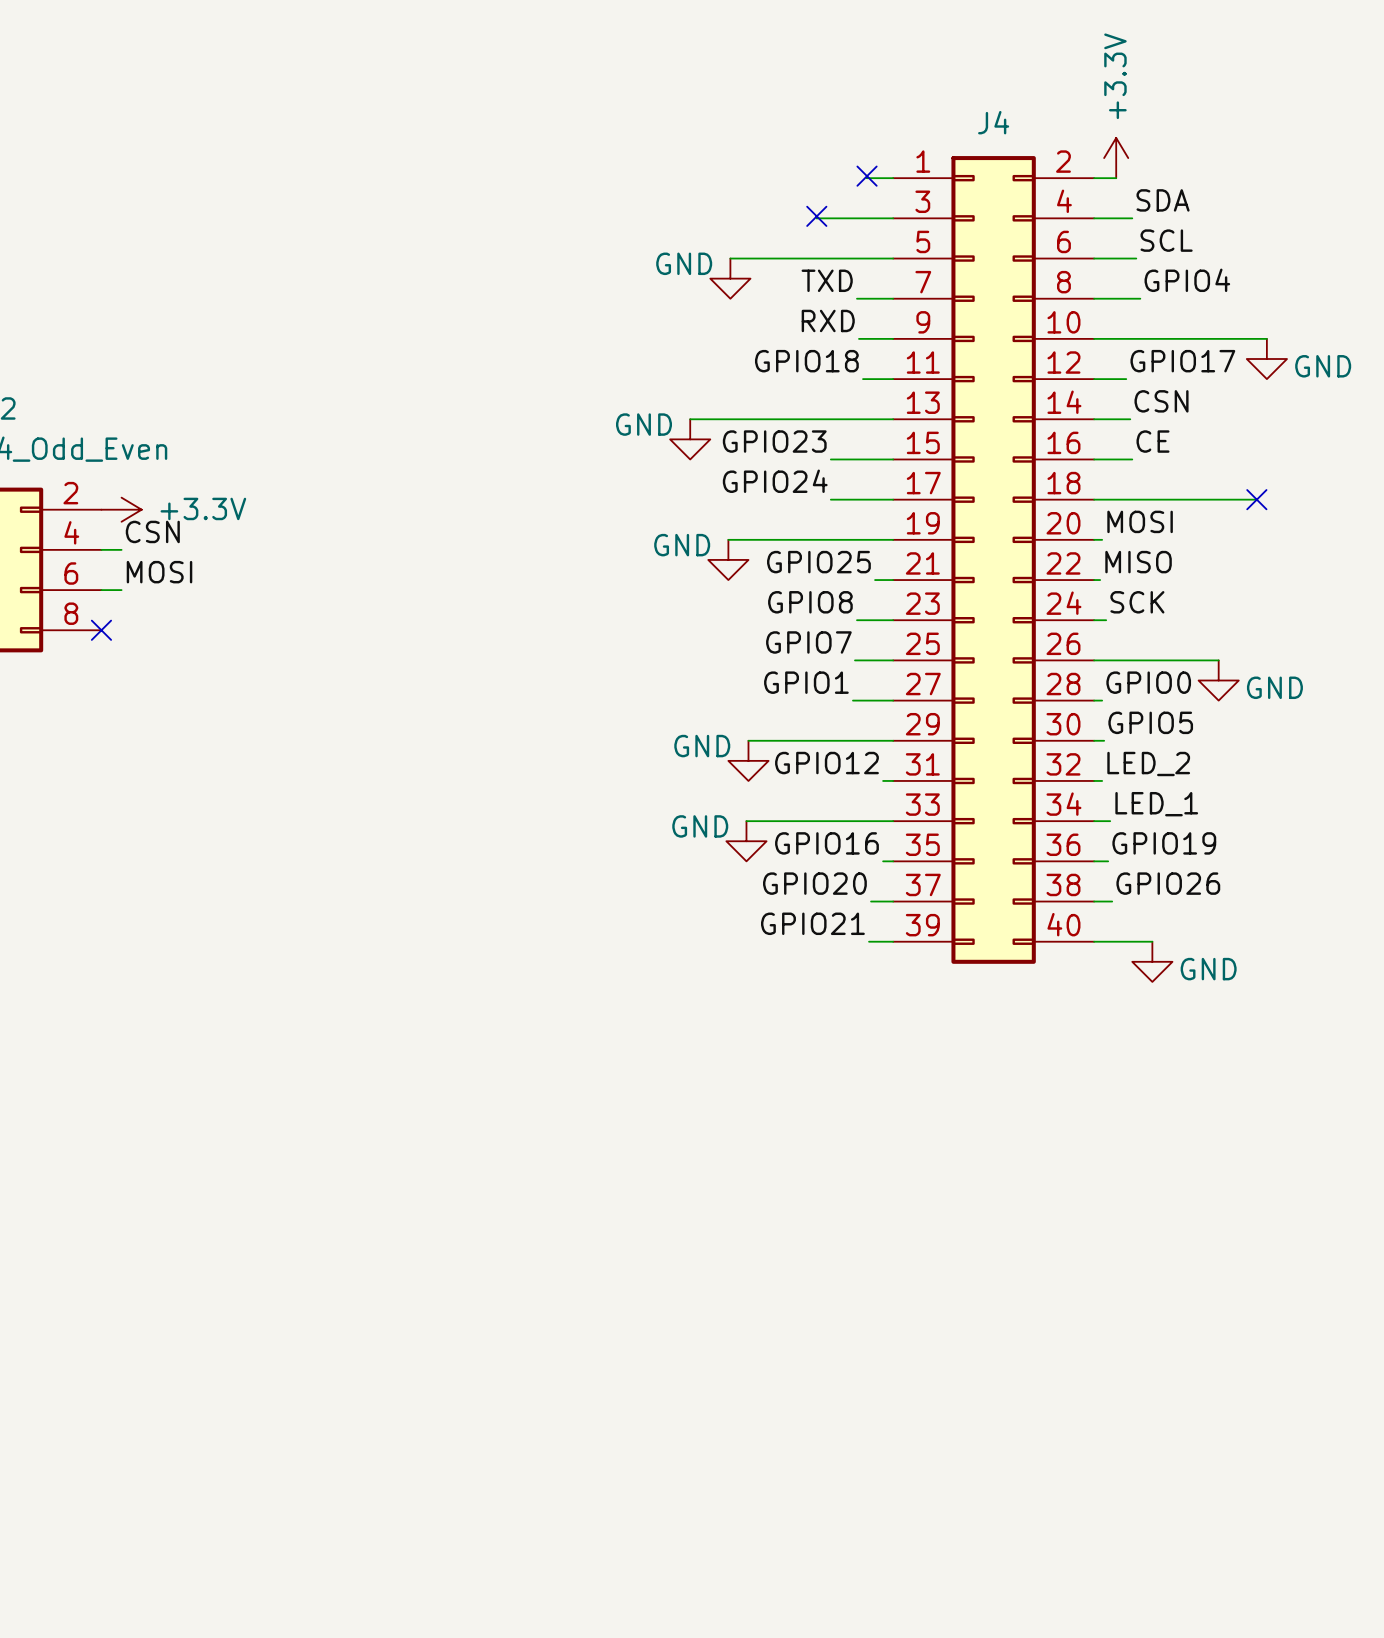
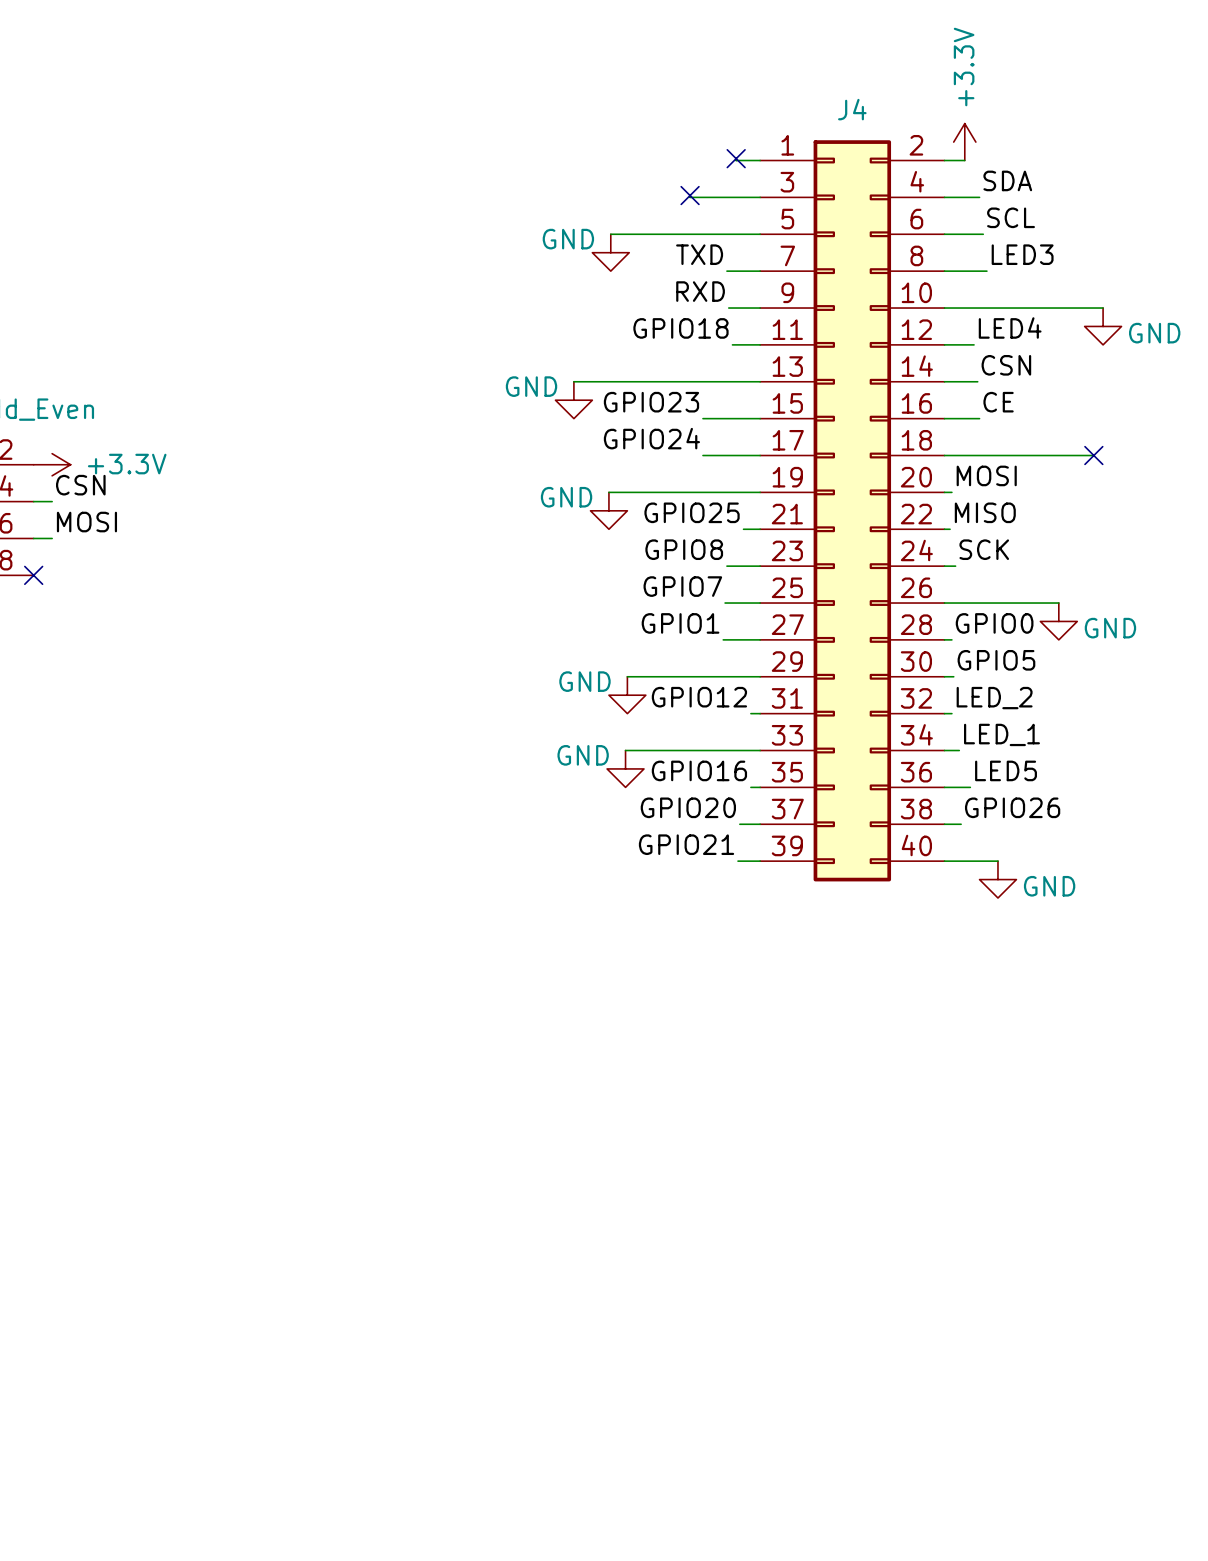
label: GPIO4 (1187, 280) -> LED3 (1022, 254)
label: GPIO17 (1182, 361) -> LED4 (1010, 328)
label: GPIO19 (1164, 843) -> LED5 (1006, 770)
wire: none -> (957, 787) (970, 787)

